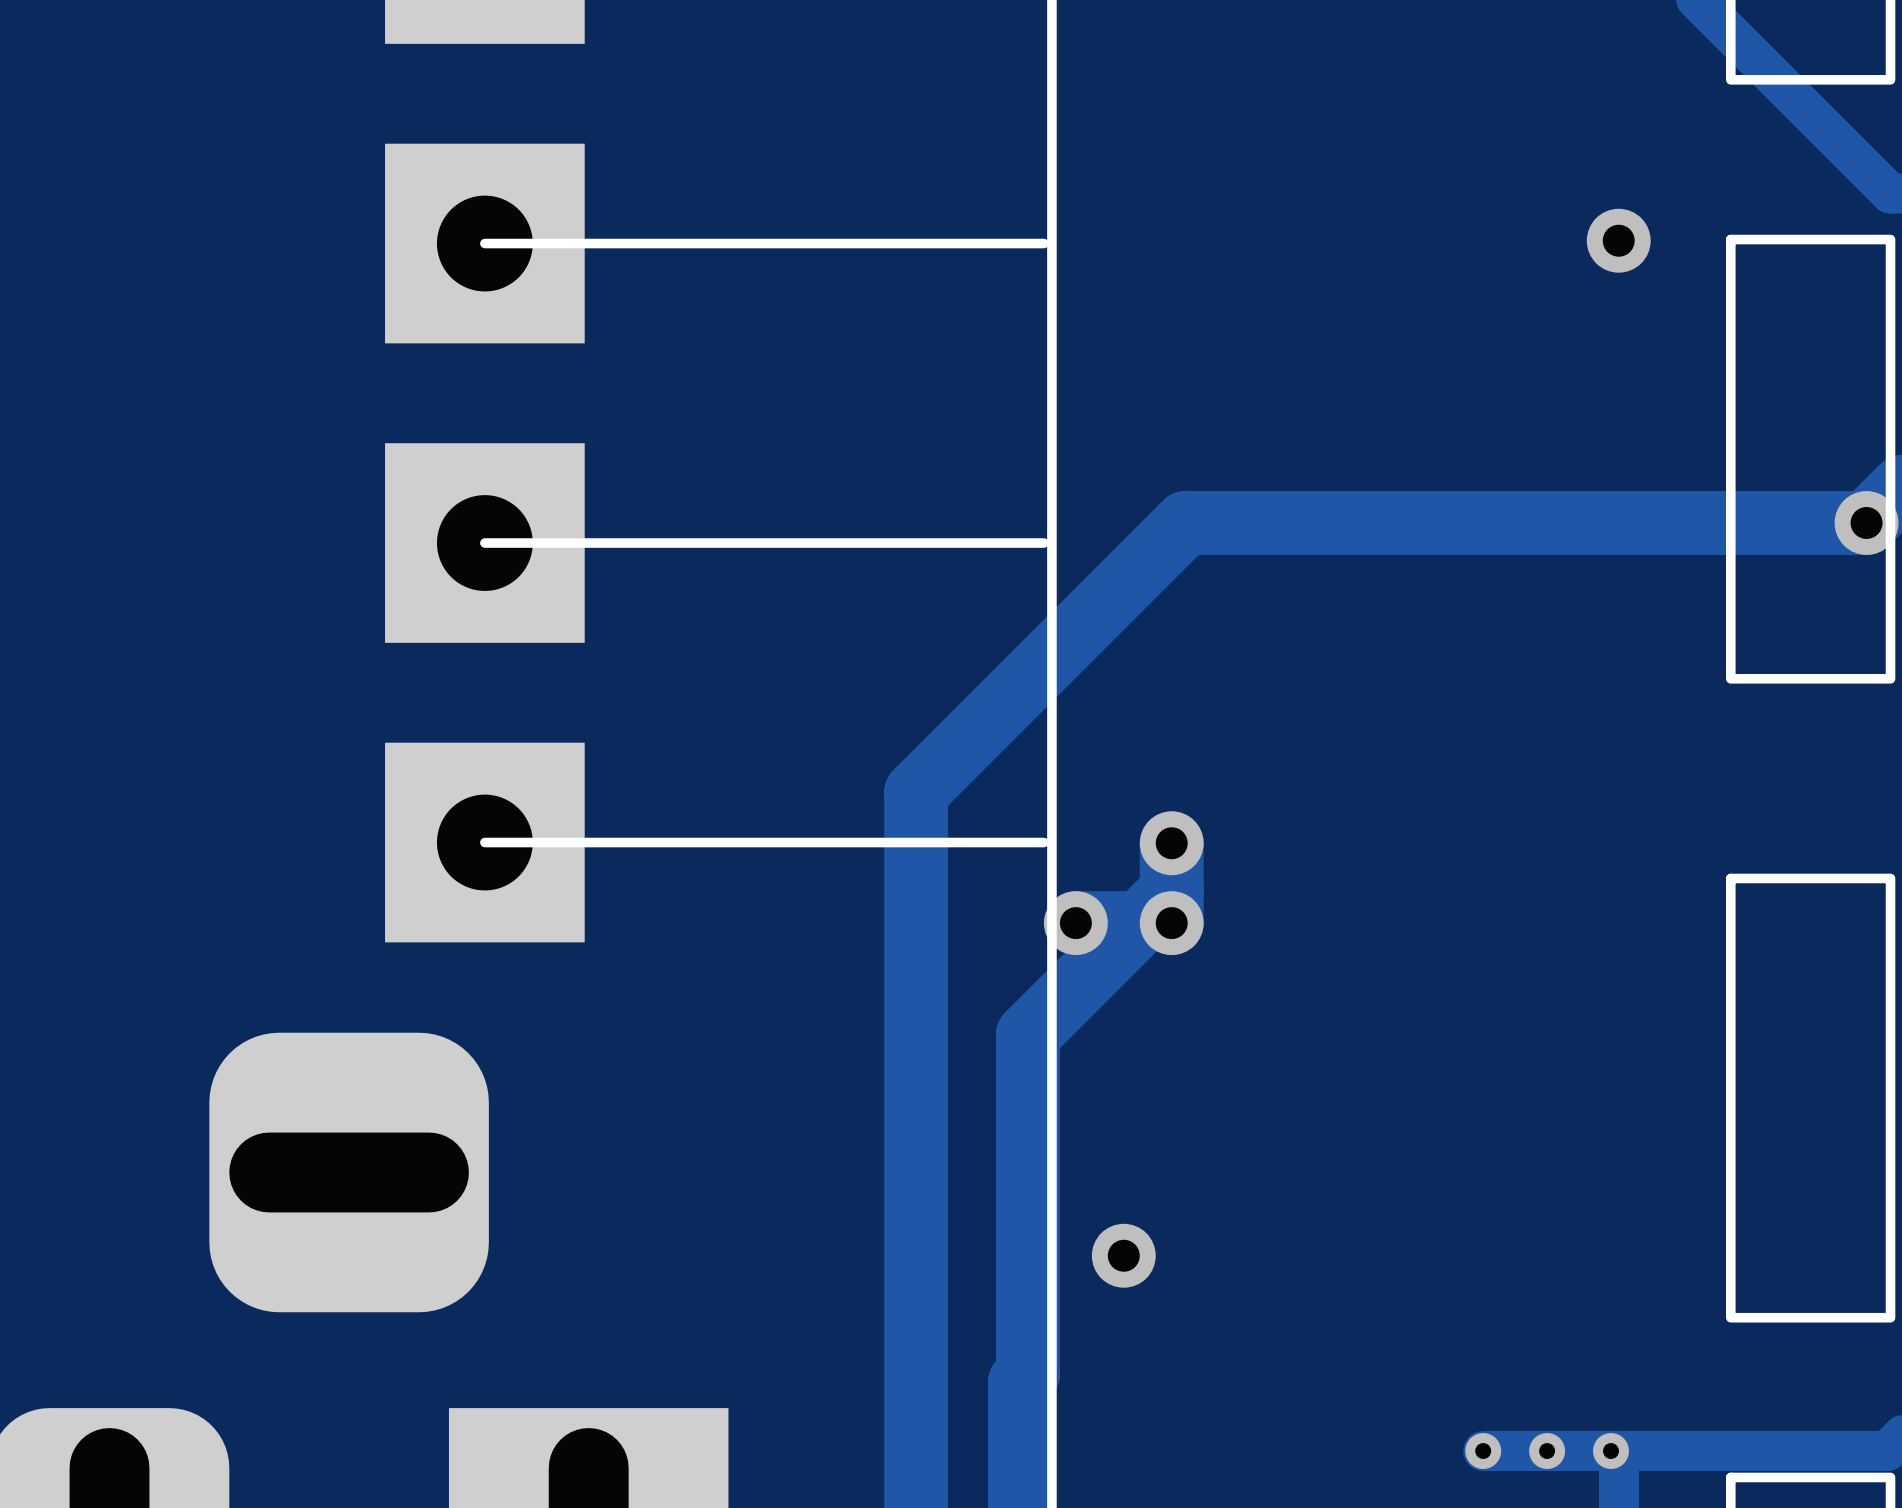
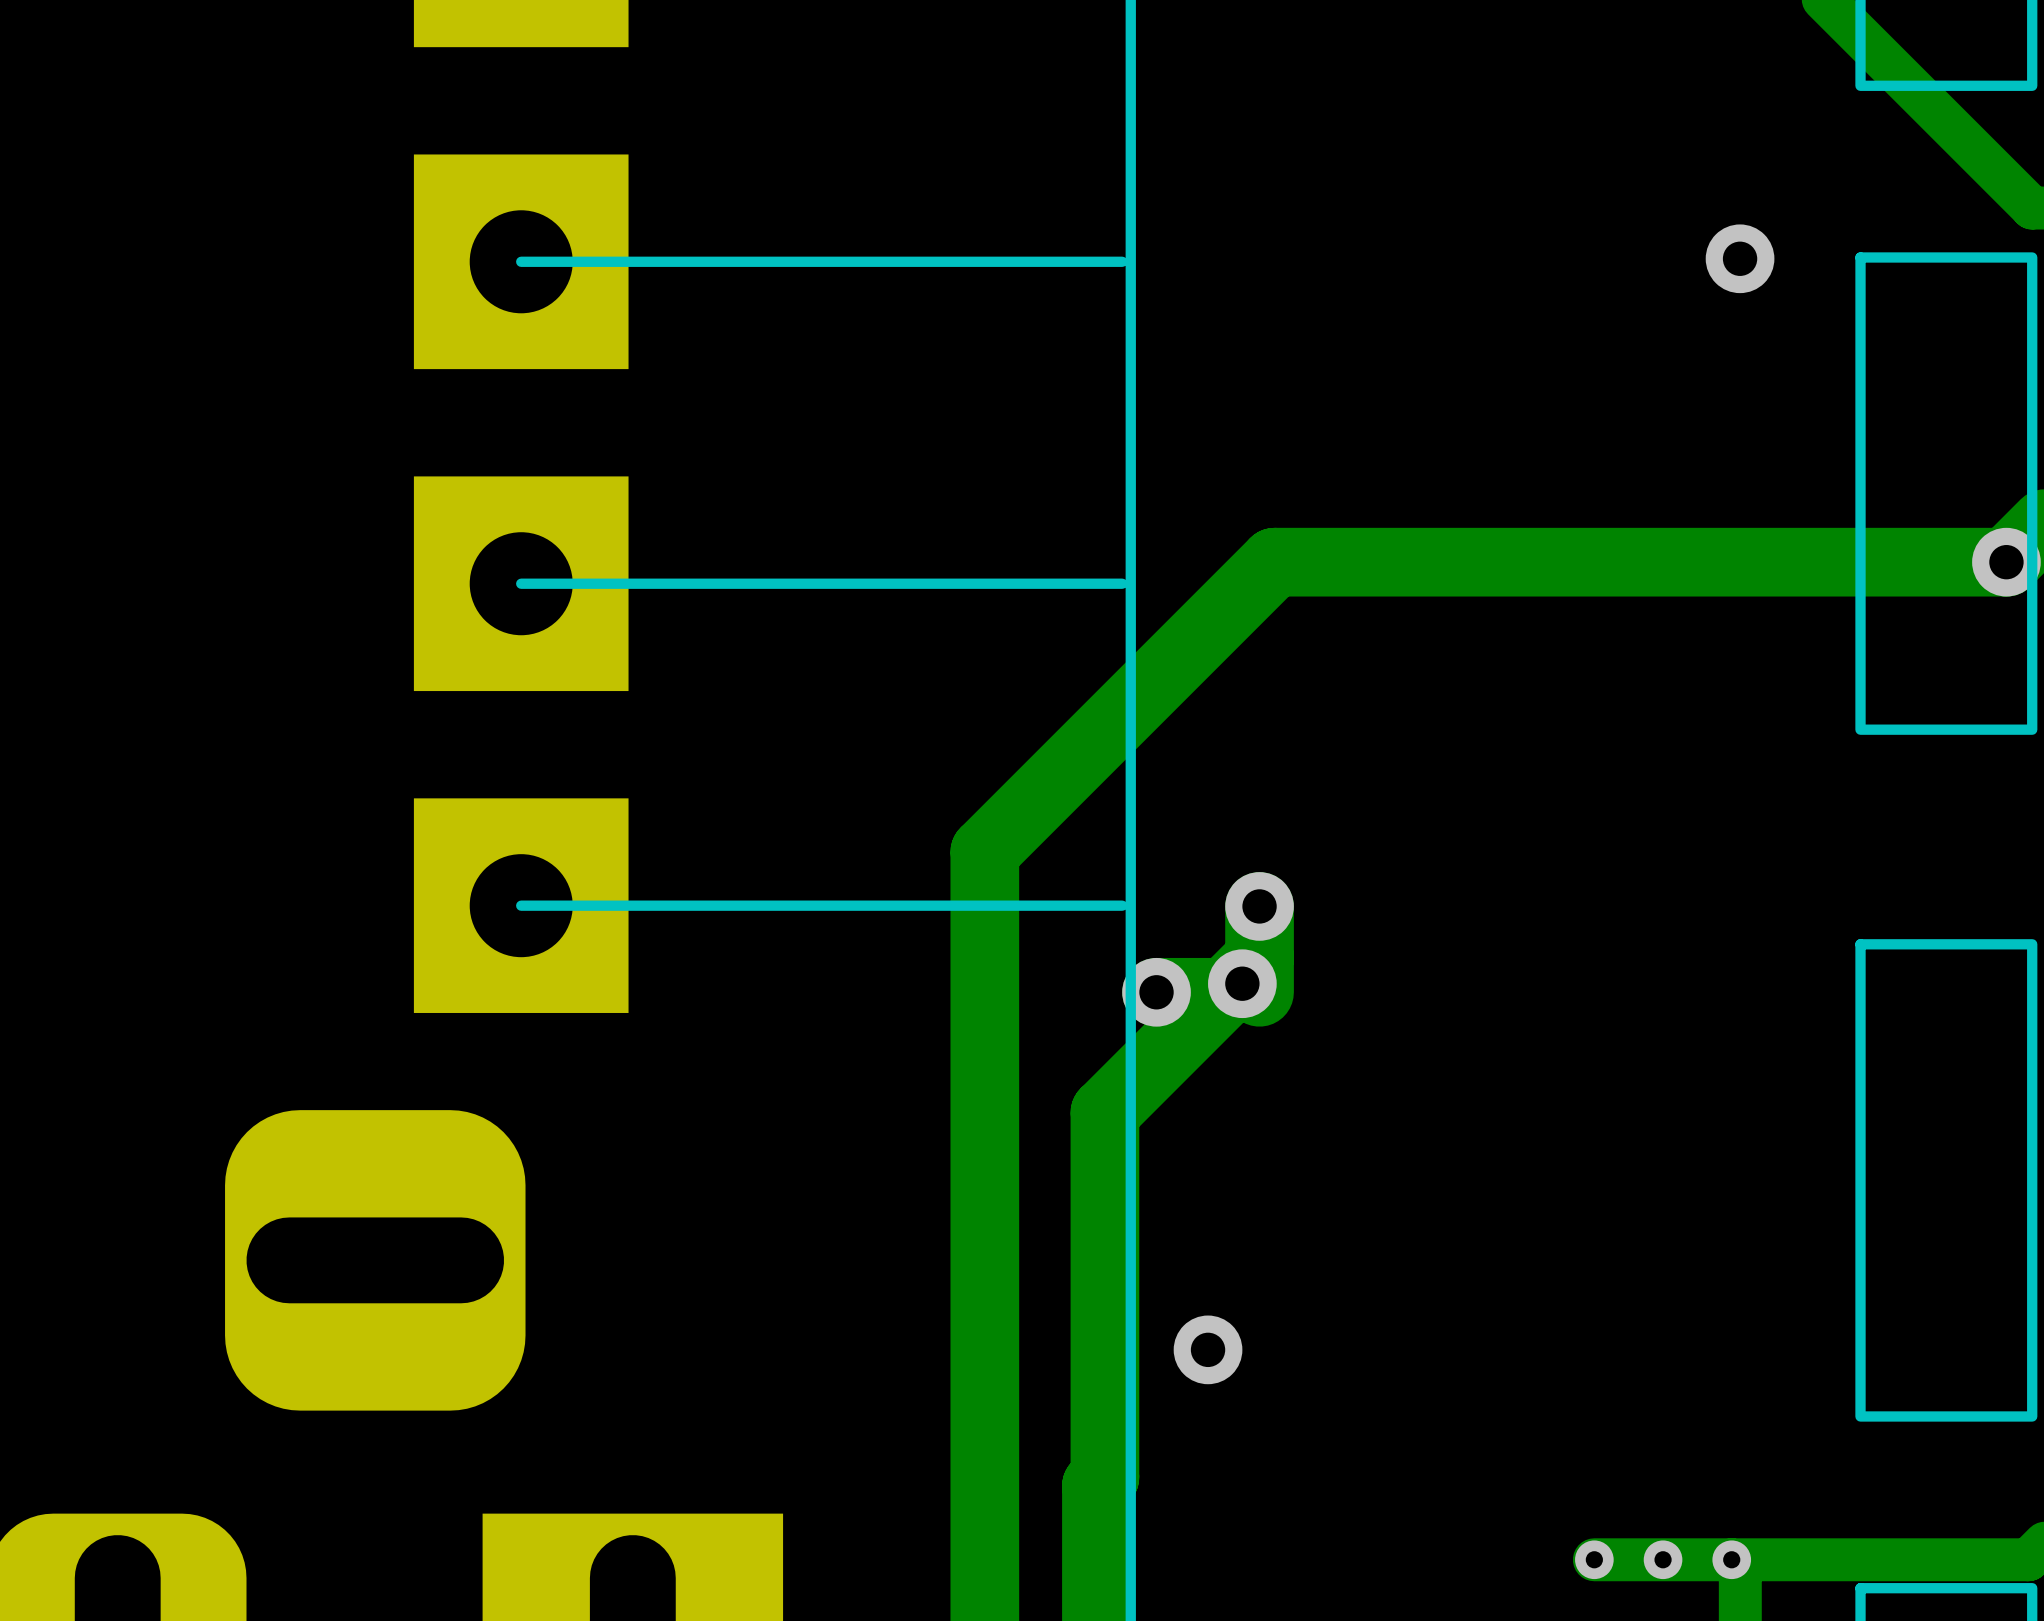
via position: (1171, 923) -> (1242, 983)

